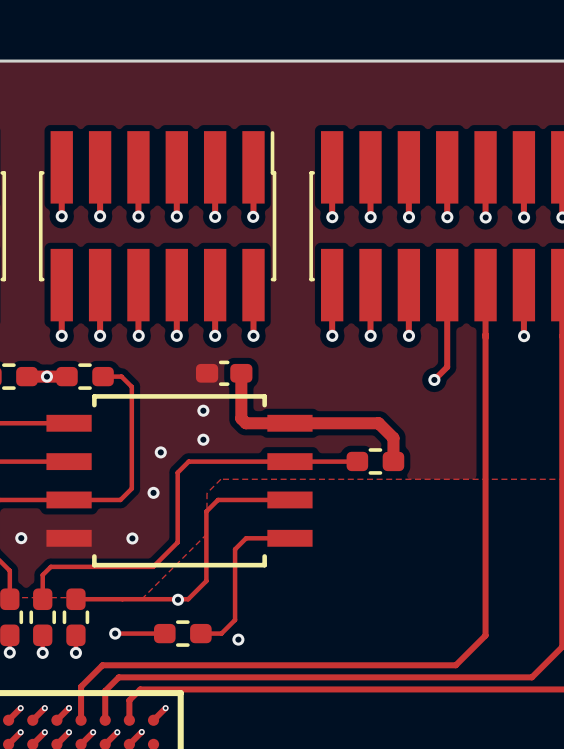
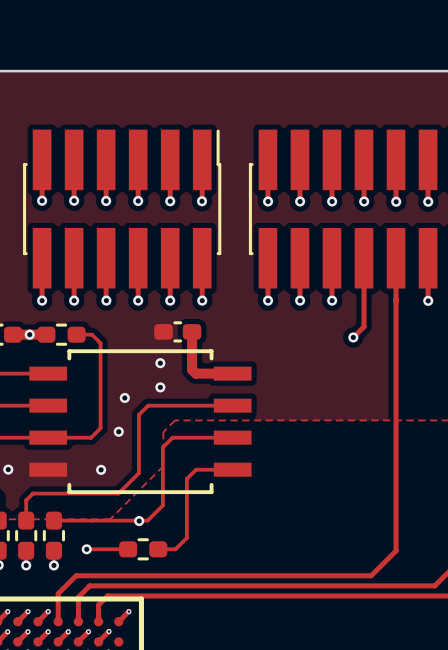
track: (289, 423) (378, 423) (393, 438) (393, 461) -> none
track: (289, 461) (357, 461) -> none
part: (375, 461) -> none
via: (238, 639) -> none

